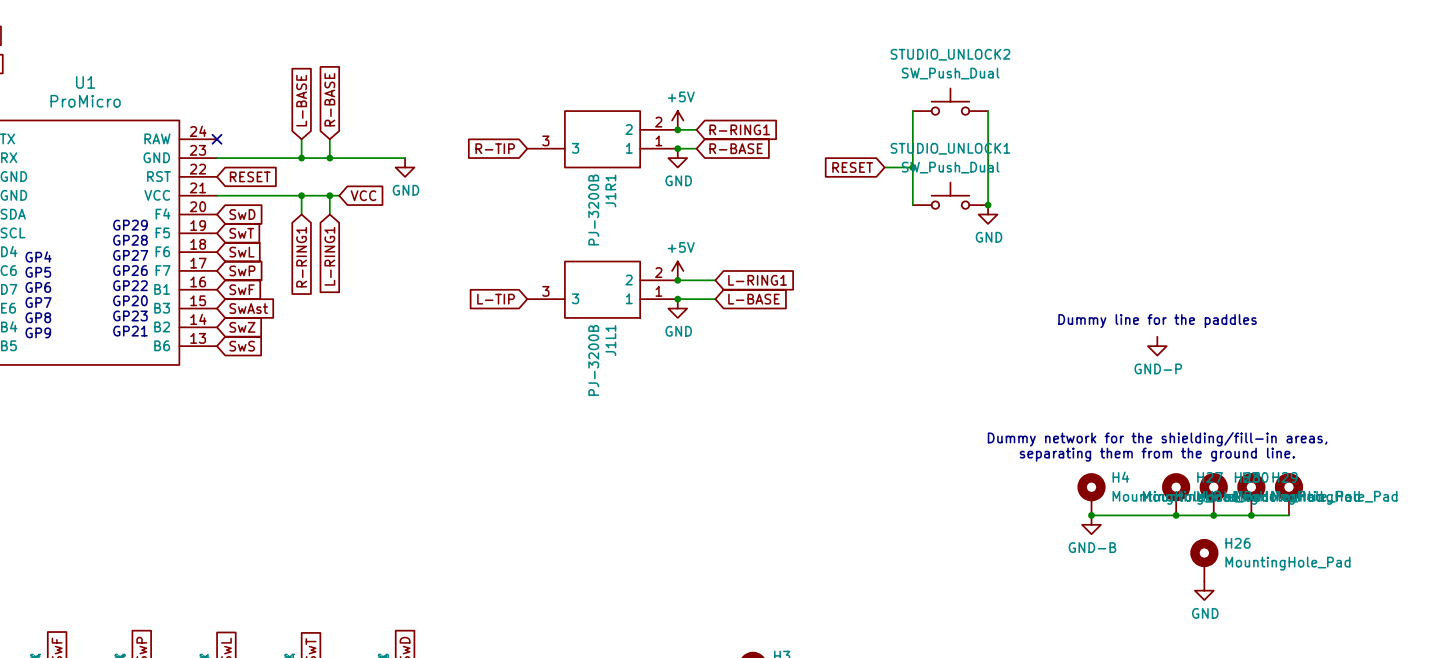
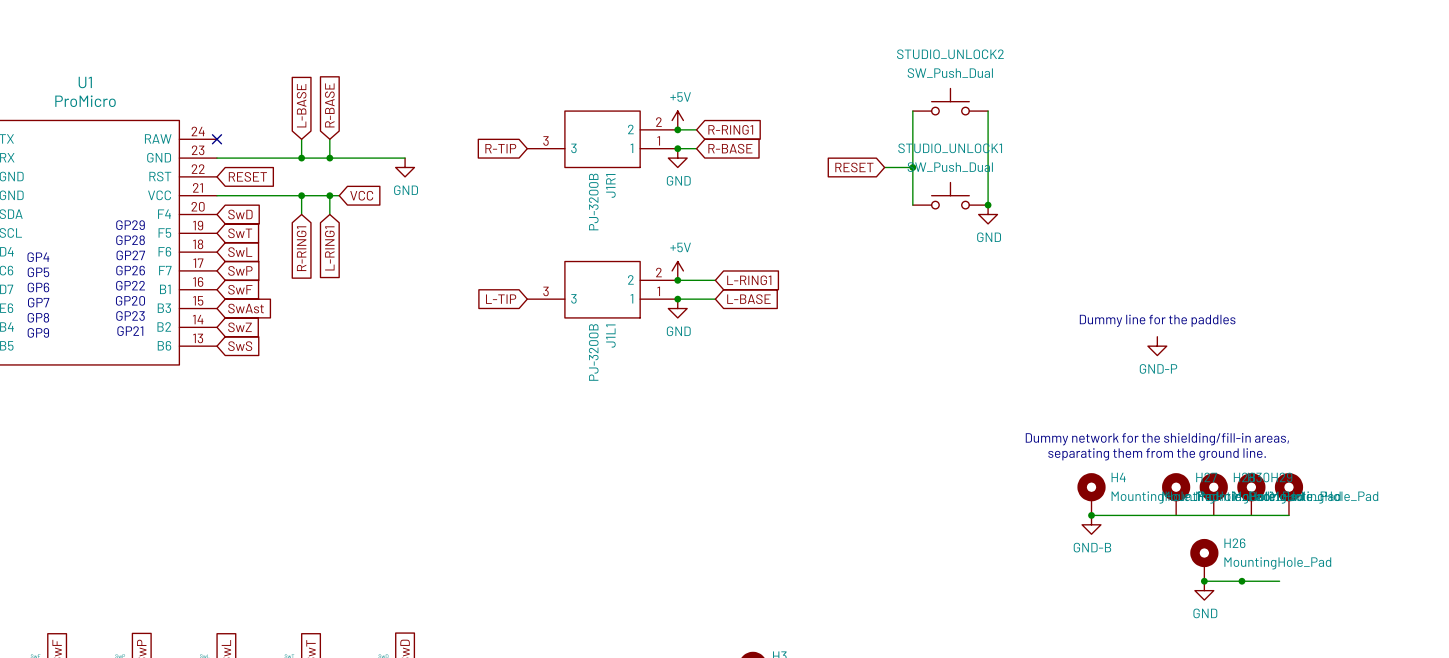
junction: (1176, 515) -> none
junction: (1213, 515) -> none
junction: (1251, 515) -> none
wire: none -> (1204, 581) (1279, 581)
junction: none -> (1204, 581)
junction: none -> (1241, 581)

